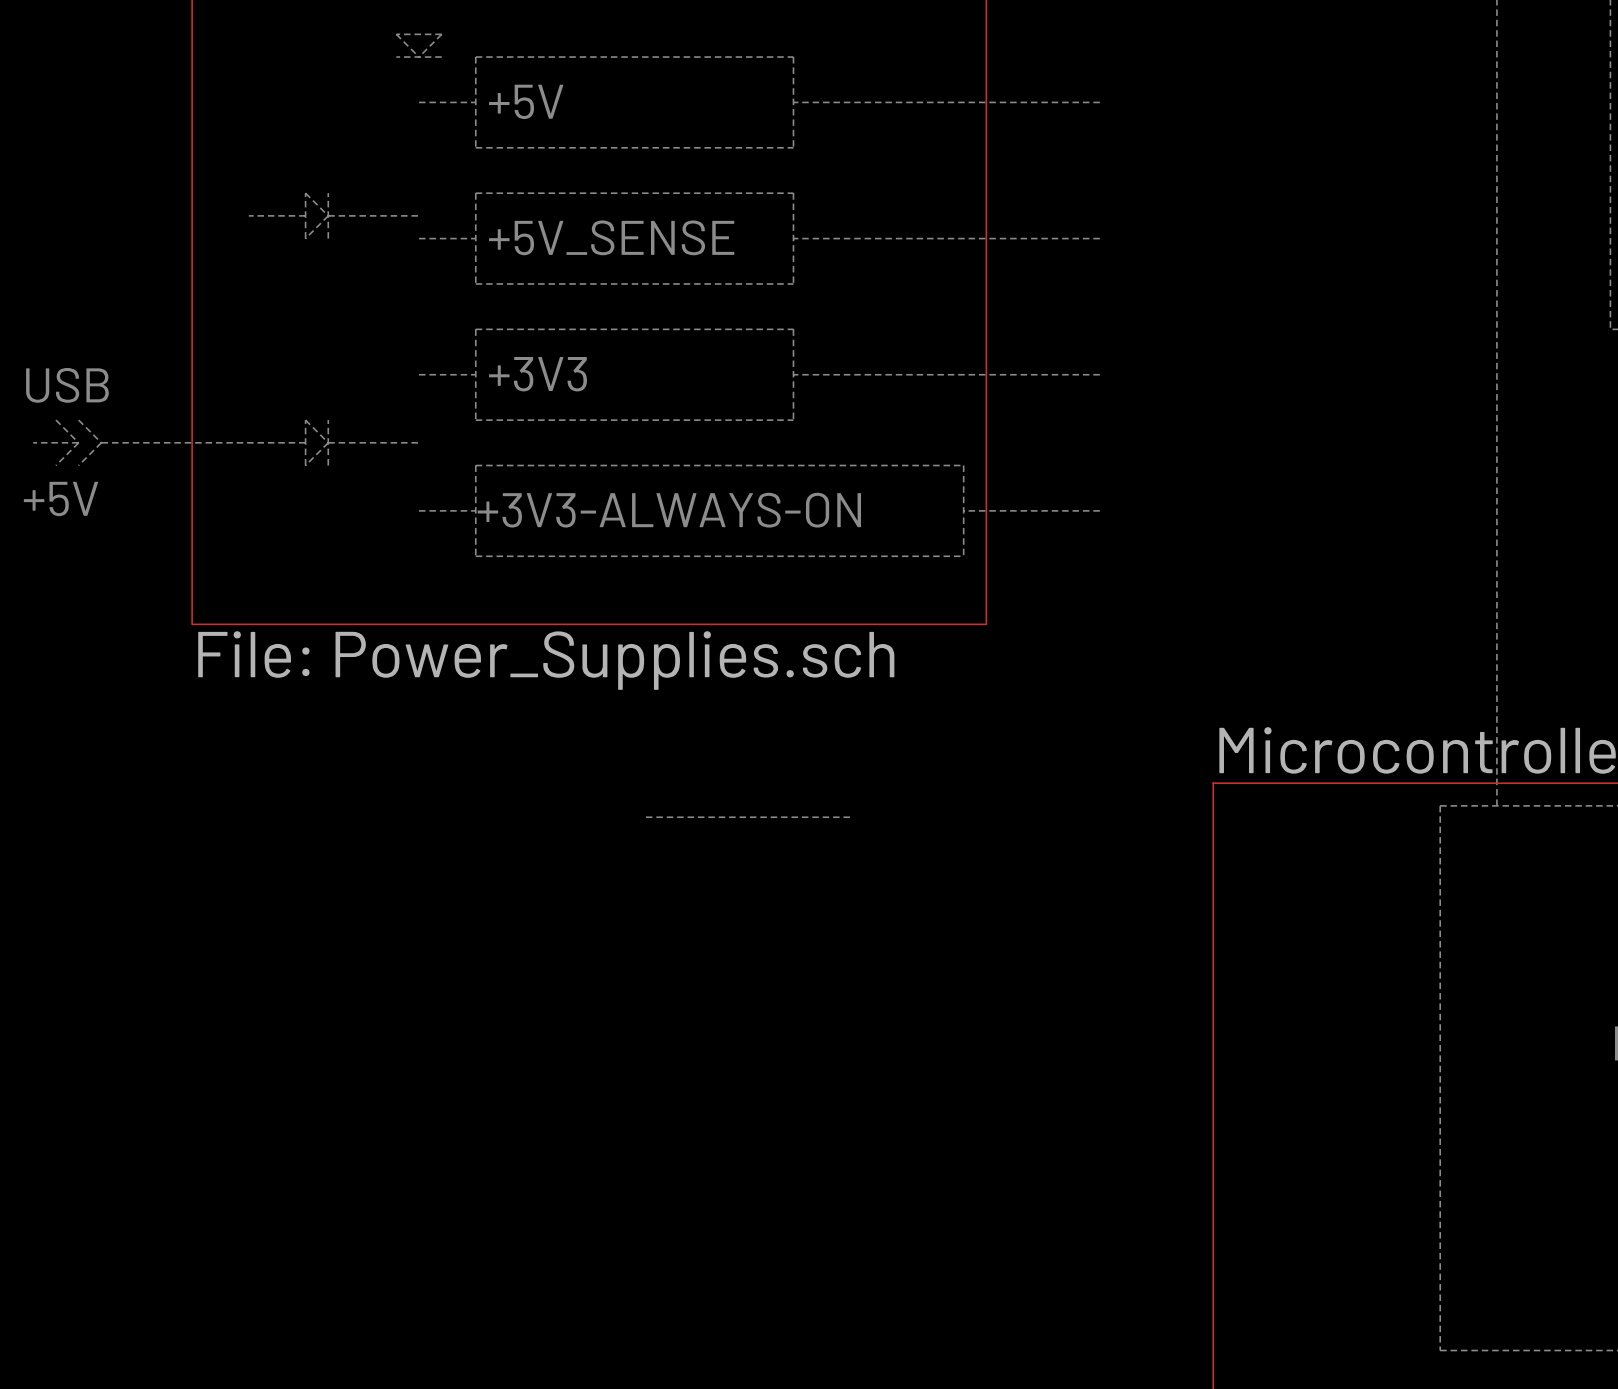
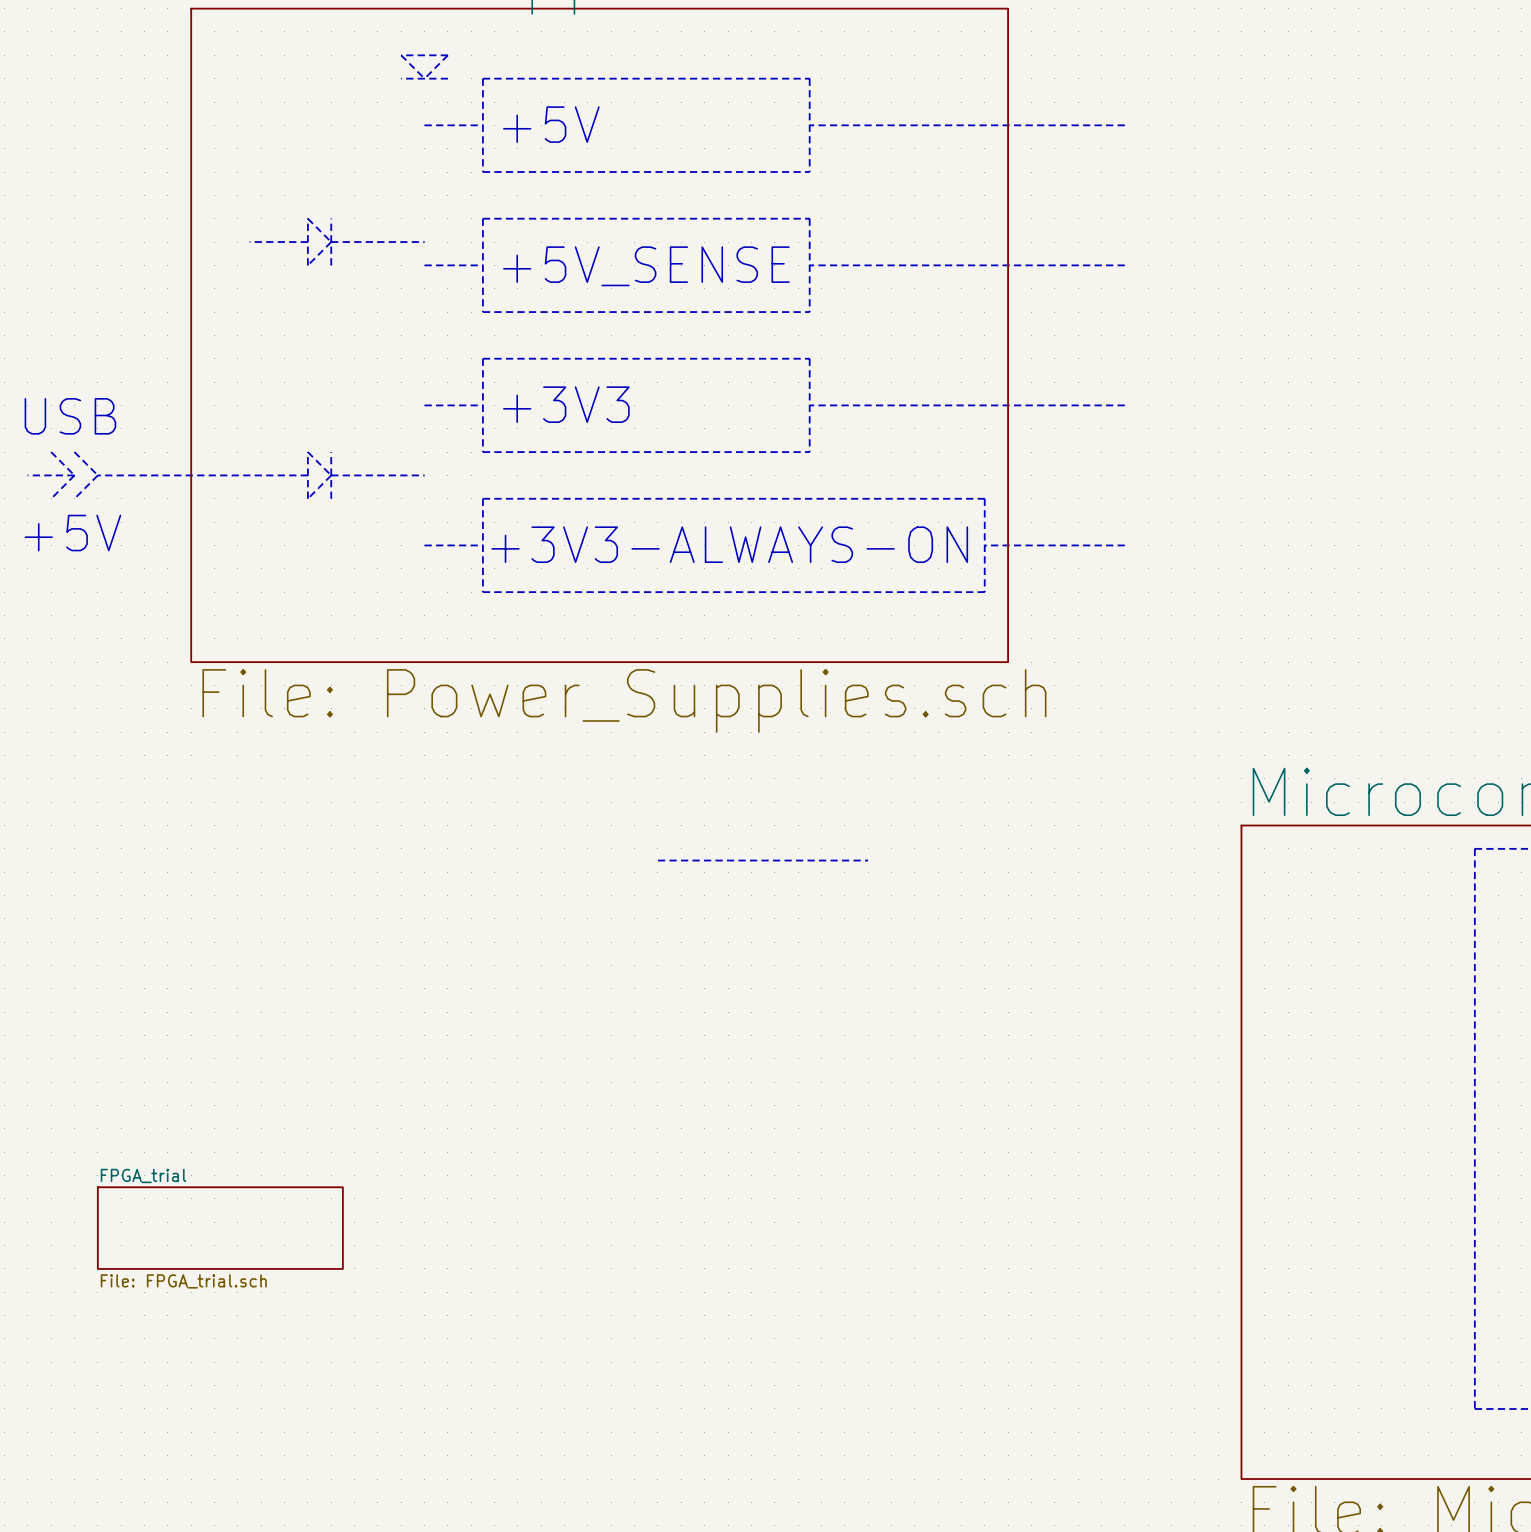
sheet FPGA_trial: none -> File: FPGA_trial.sch (220, 1228)

